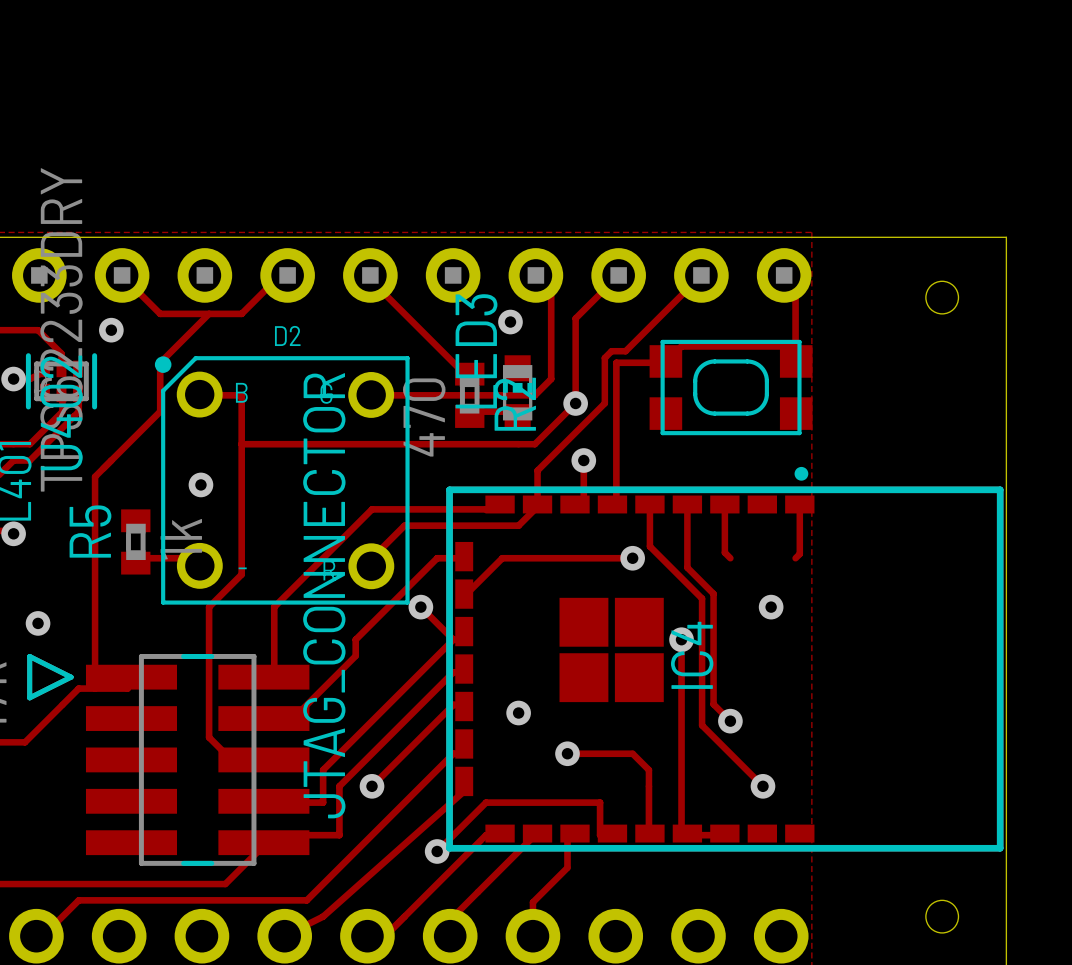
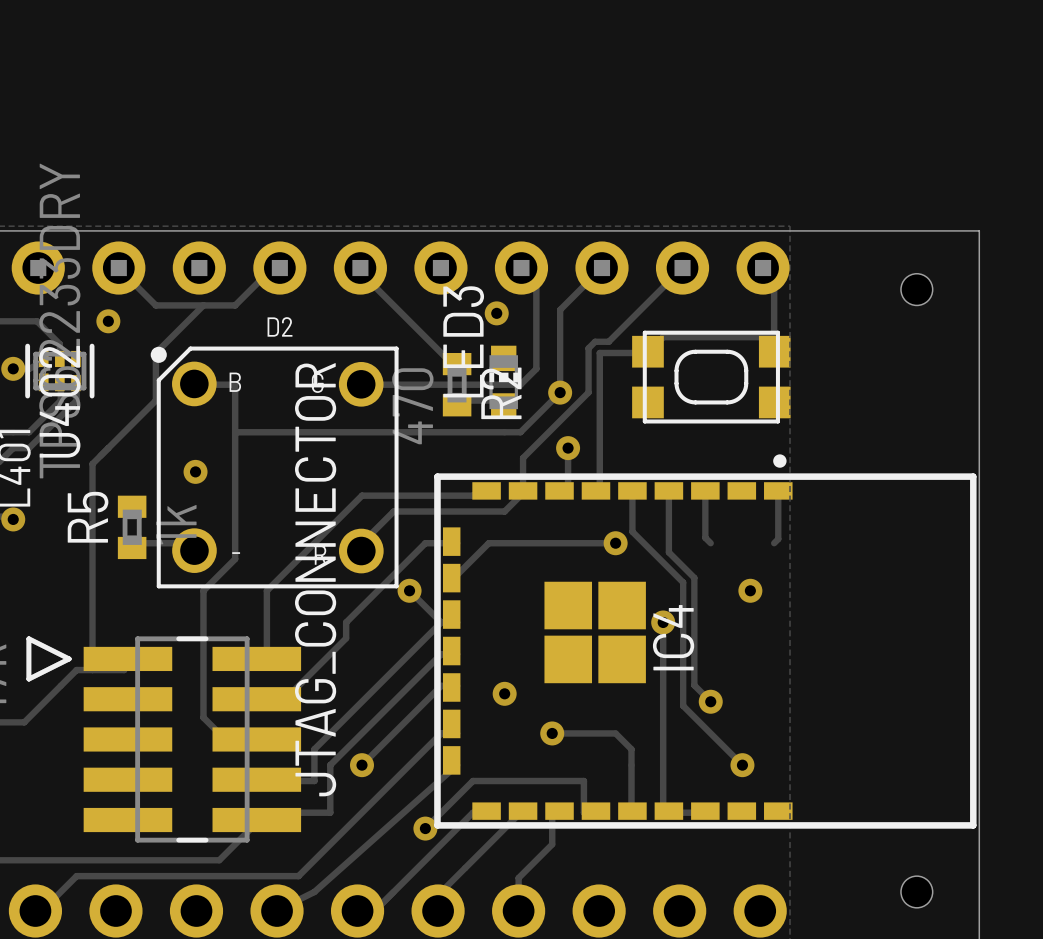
via: (38, 623) -> none

